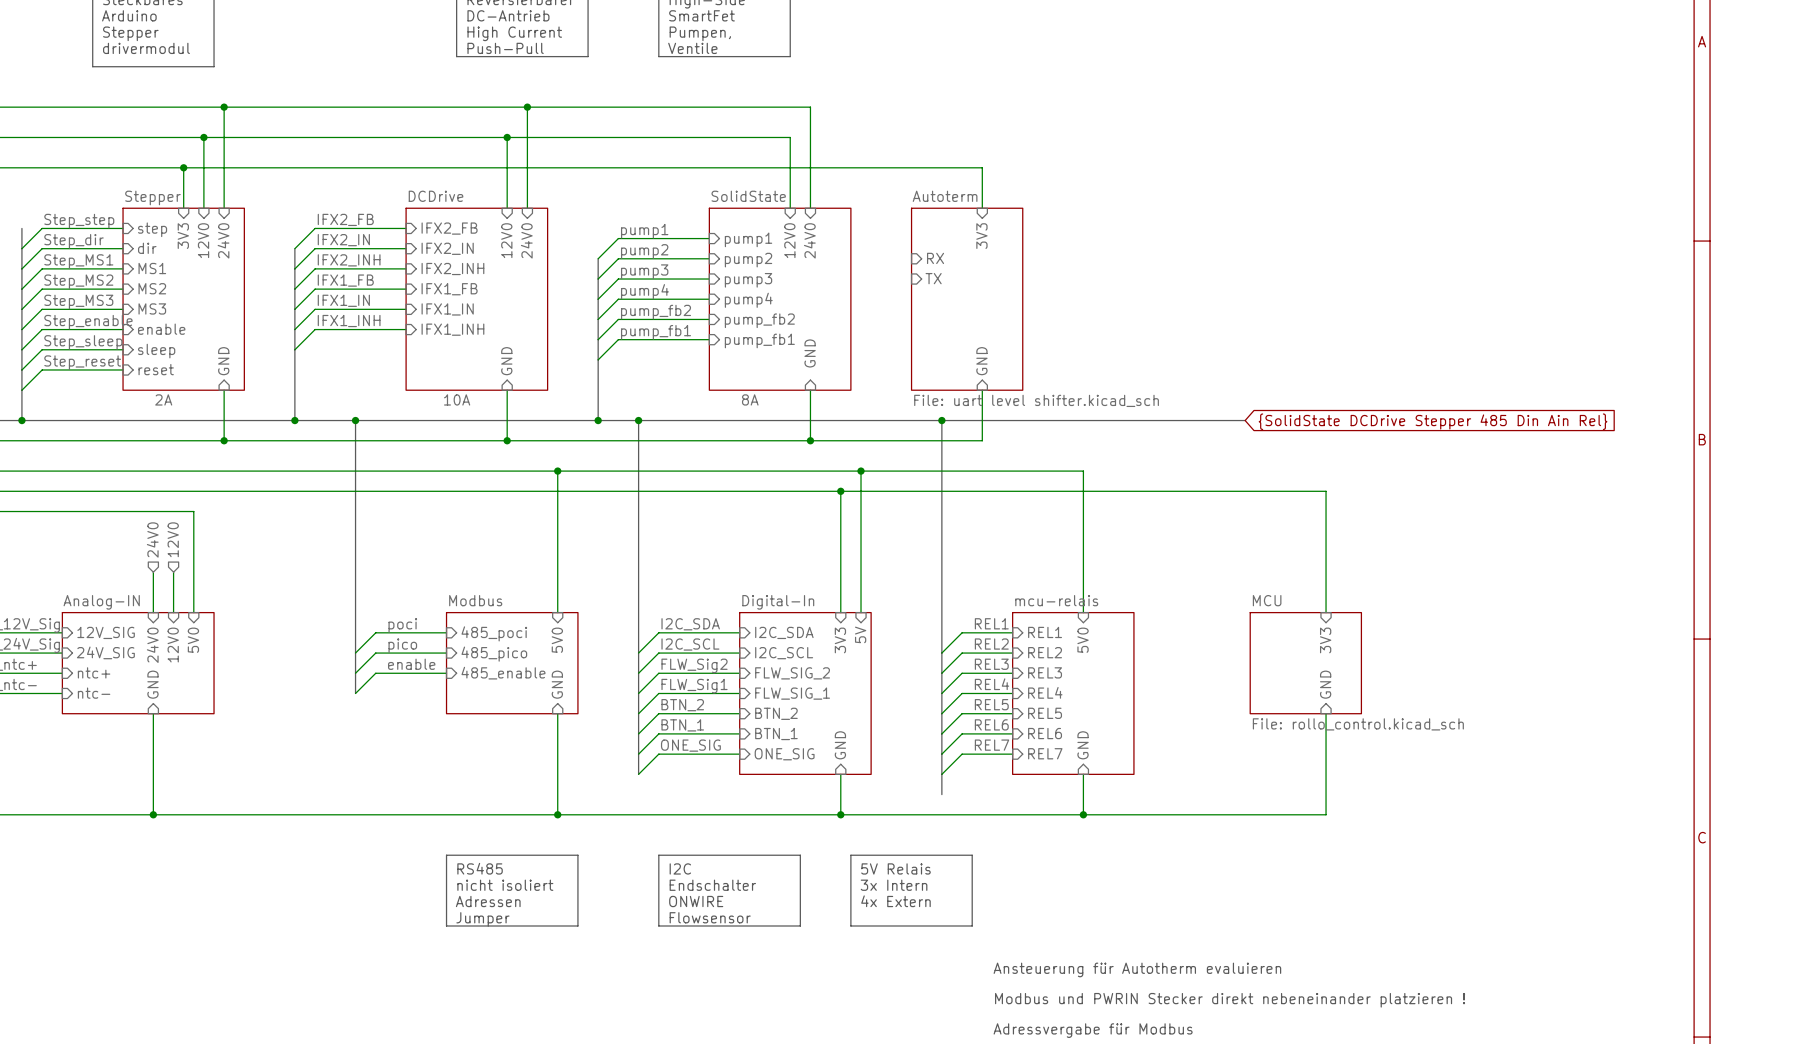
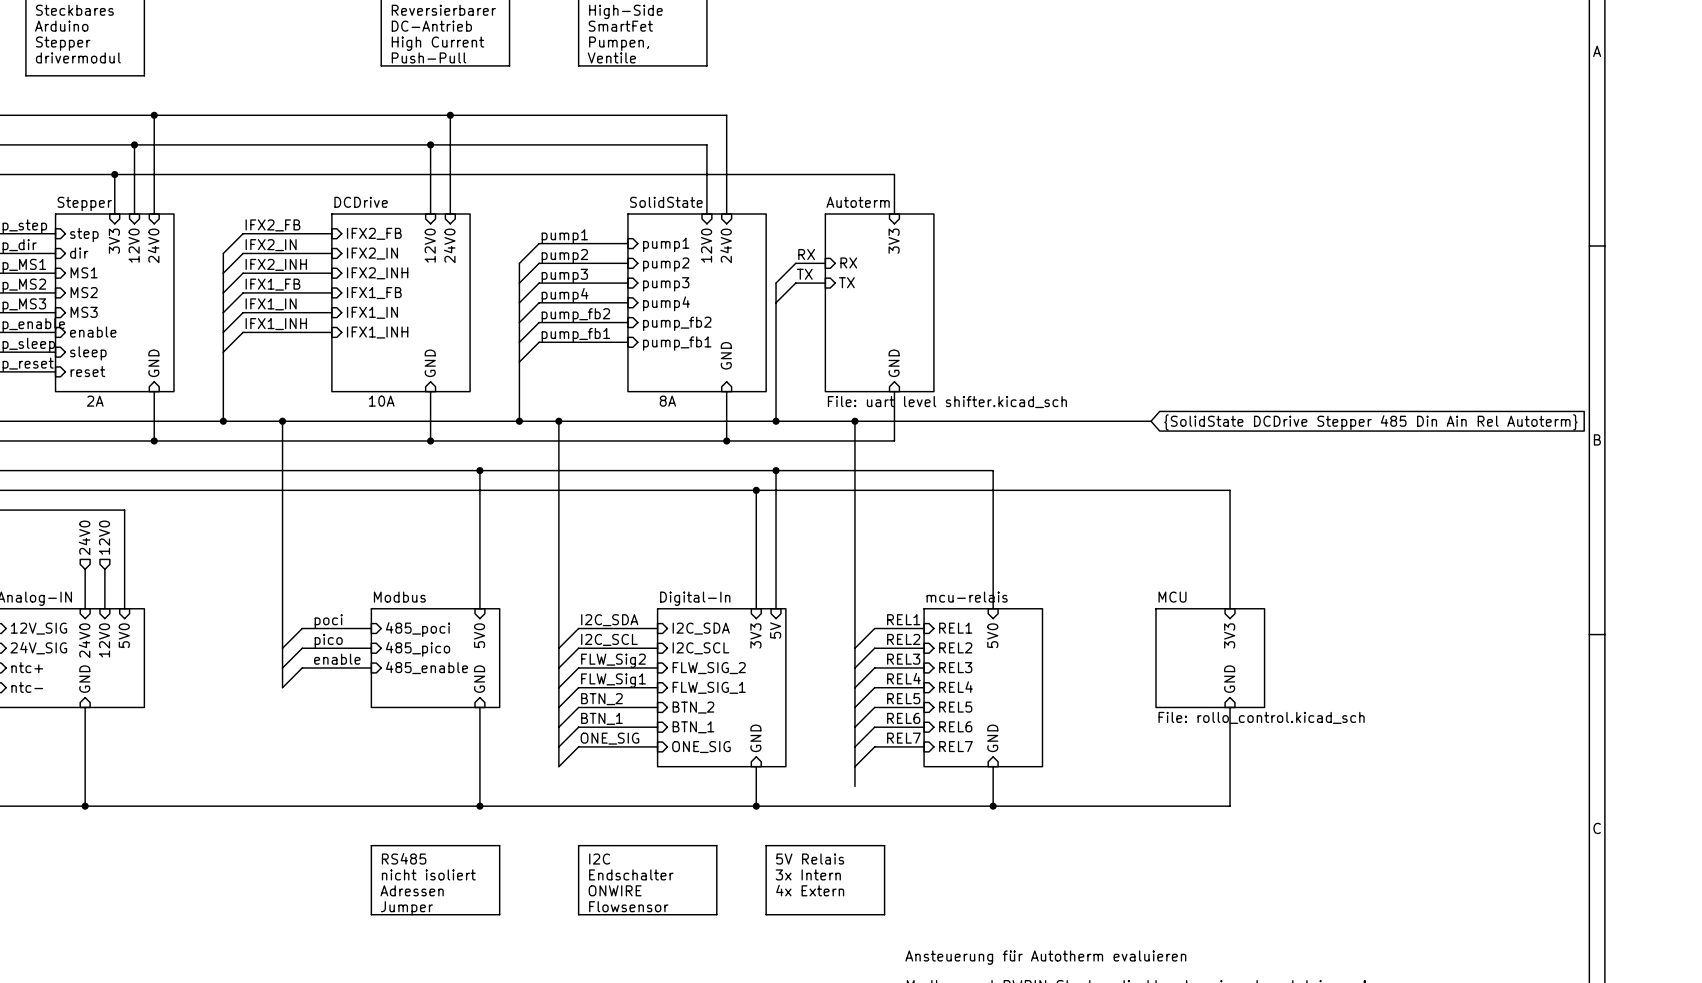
label: none -> RX (806, 254)
wire: none -> (825, 263) (795, 263) (776, 283)
label: none -> TX (804, 274)
bus: none -> (776, 283) (776, 421)
wire: none -> (825, 283) (795, 283) (776, 302)
junction: none -> (776, 421)
global label: {SolidState DCDrive Stepper 485 Din Ain Rel} (1433, 421) -> {SolidState DCDrive Stepper 485 Din Ain Rel Autoterm} (1370, 422)

